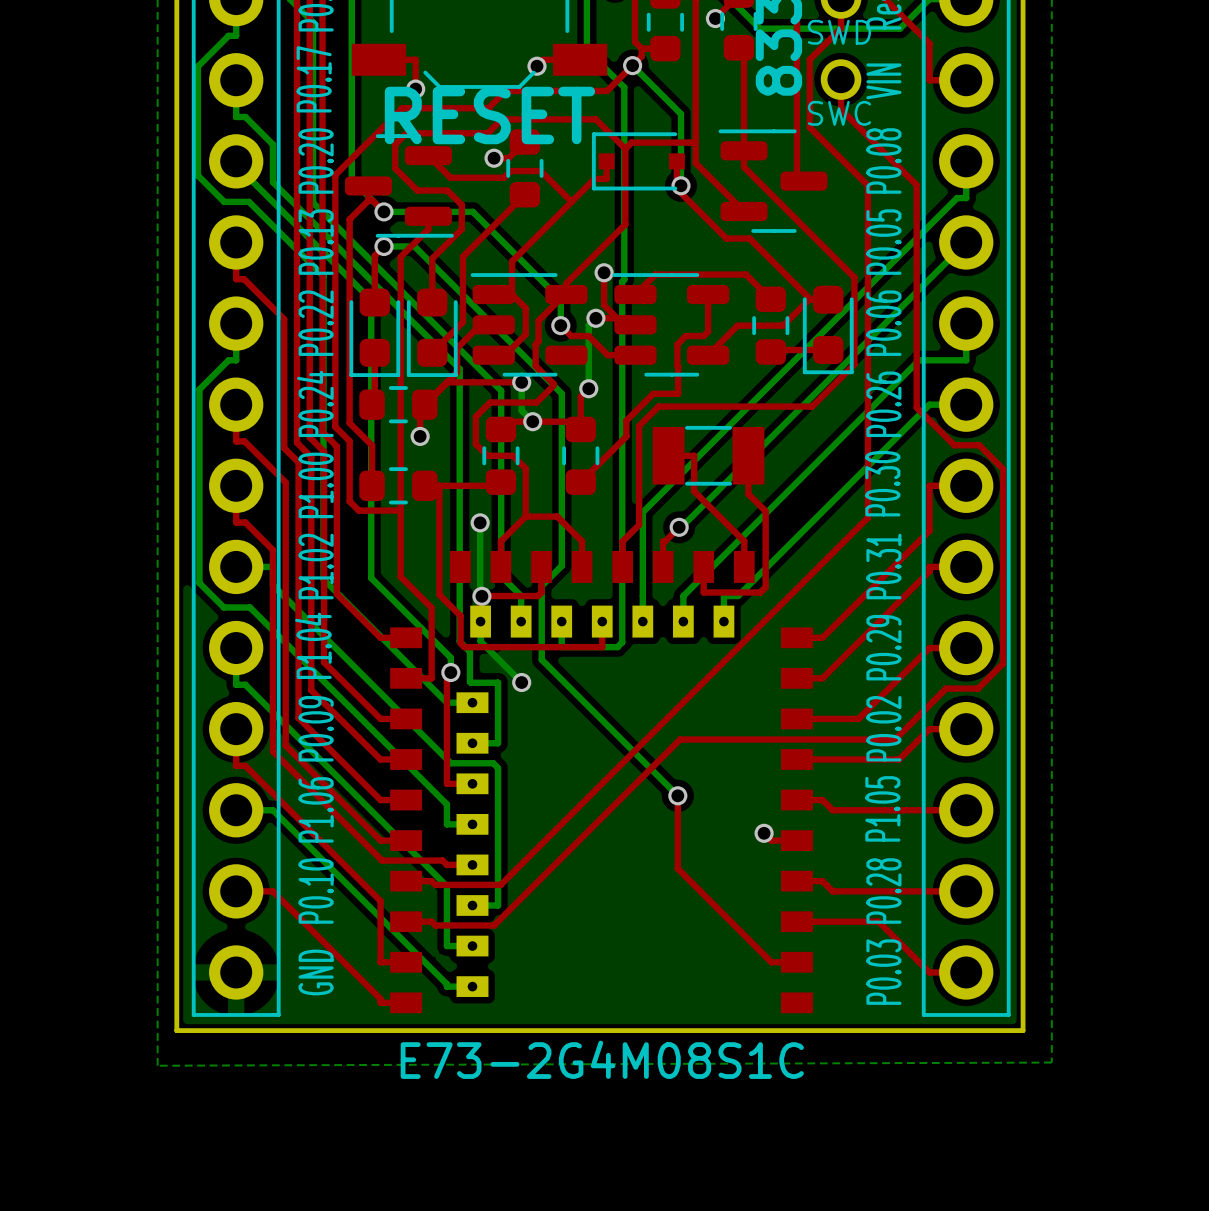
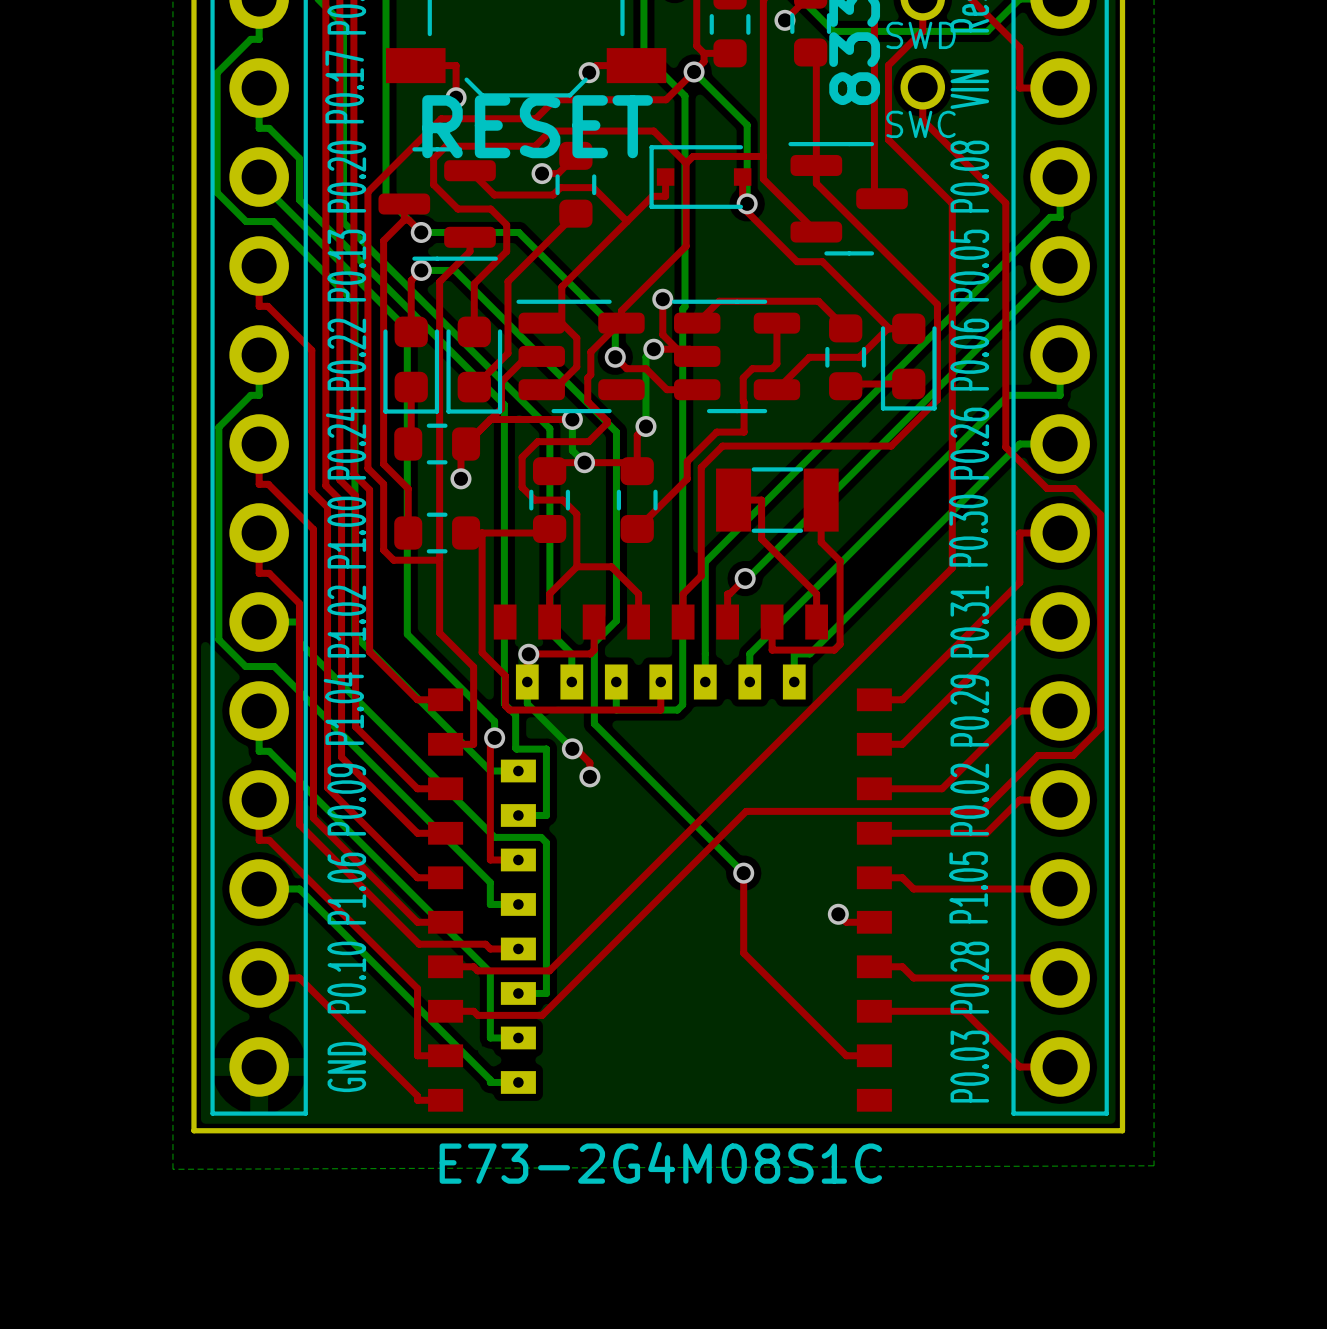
bottom track: (480, 522) (480, 594) (481, 596) -> none
via: (480, 522) -> none
top track: none -> (575, 748) (589, 762) (589, 776)
via: none -> (589, 776)

